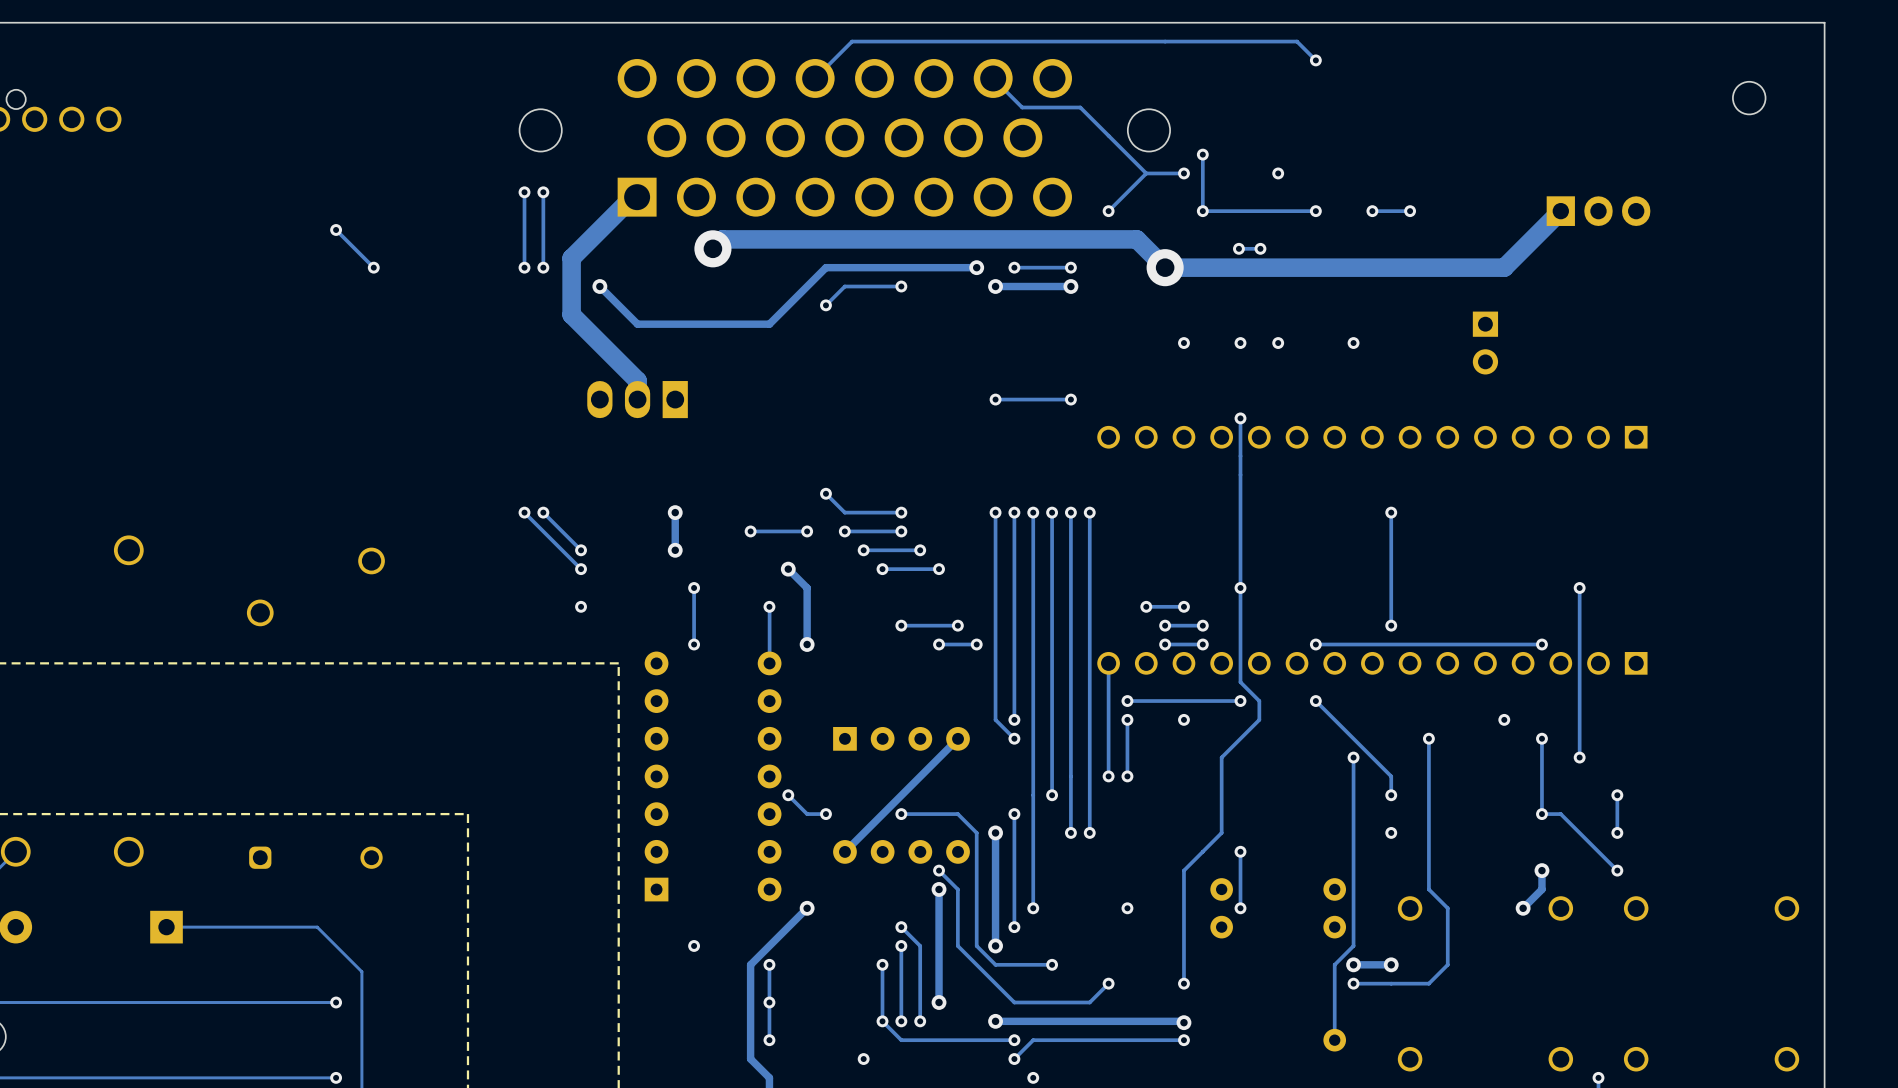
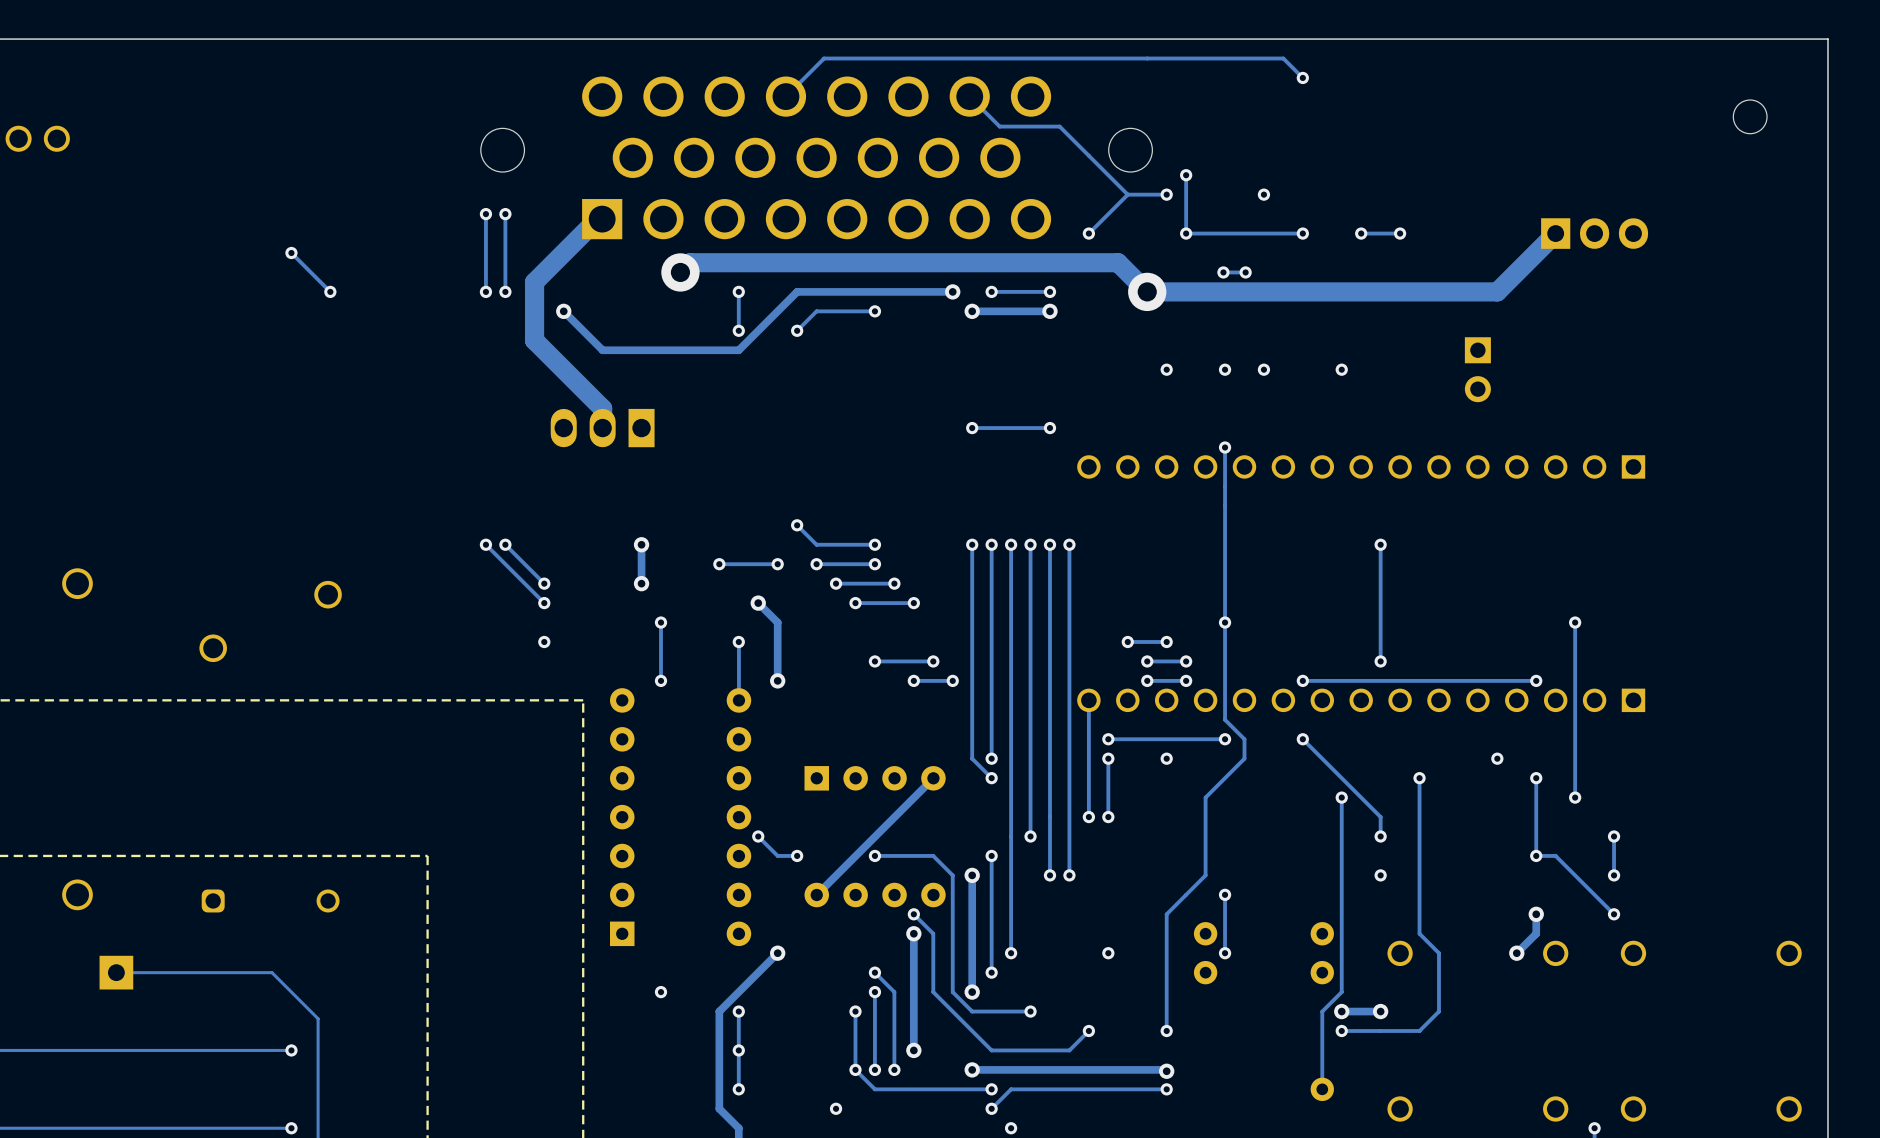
track: none -> (738, 291) (738, 330)
via: none -> (738, 291)
via: none -> (738, 330)

